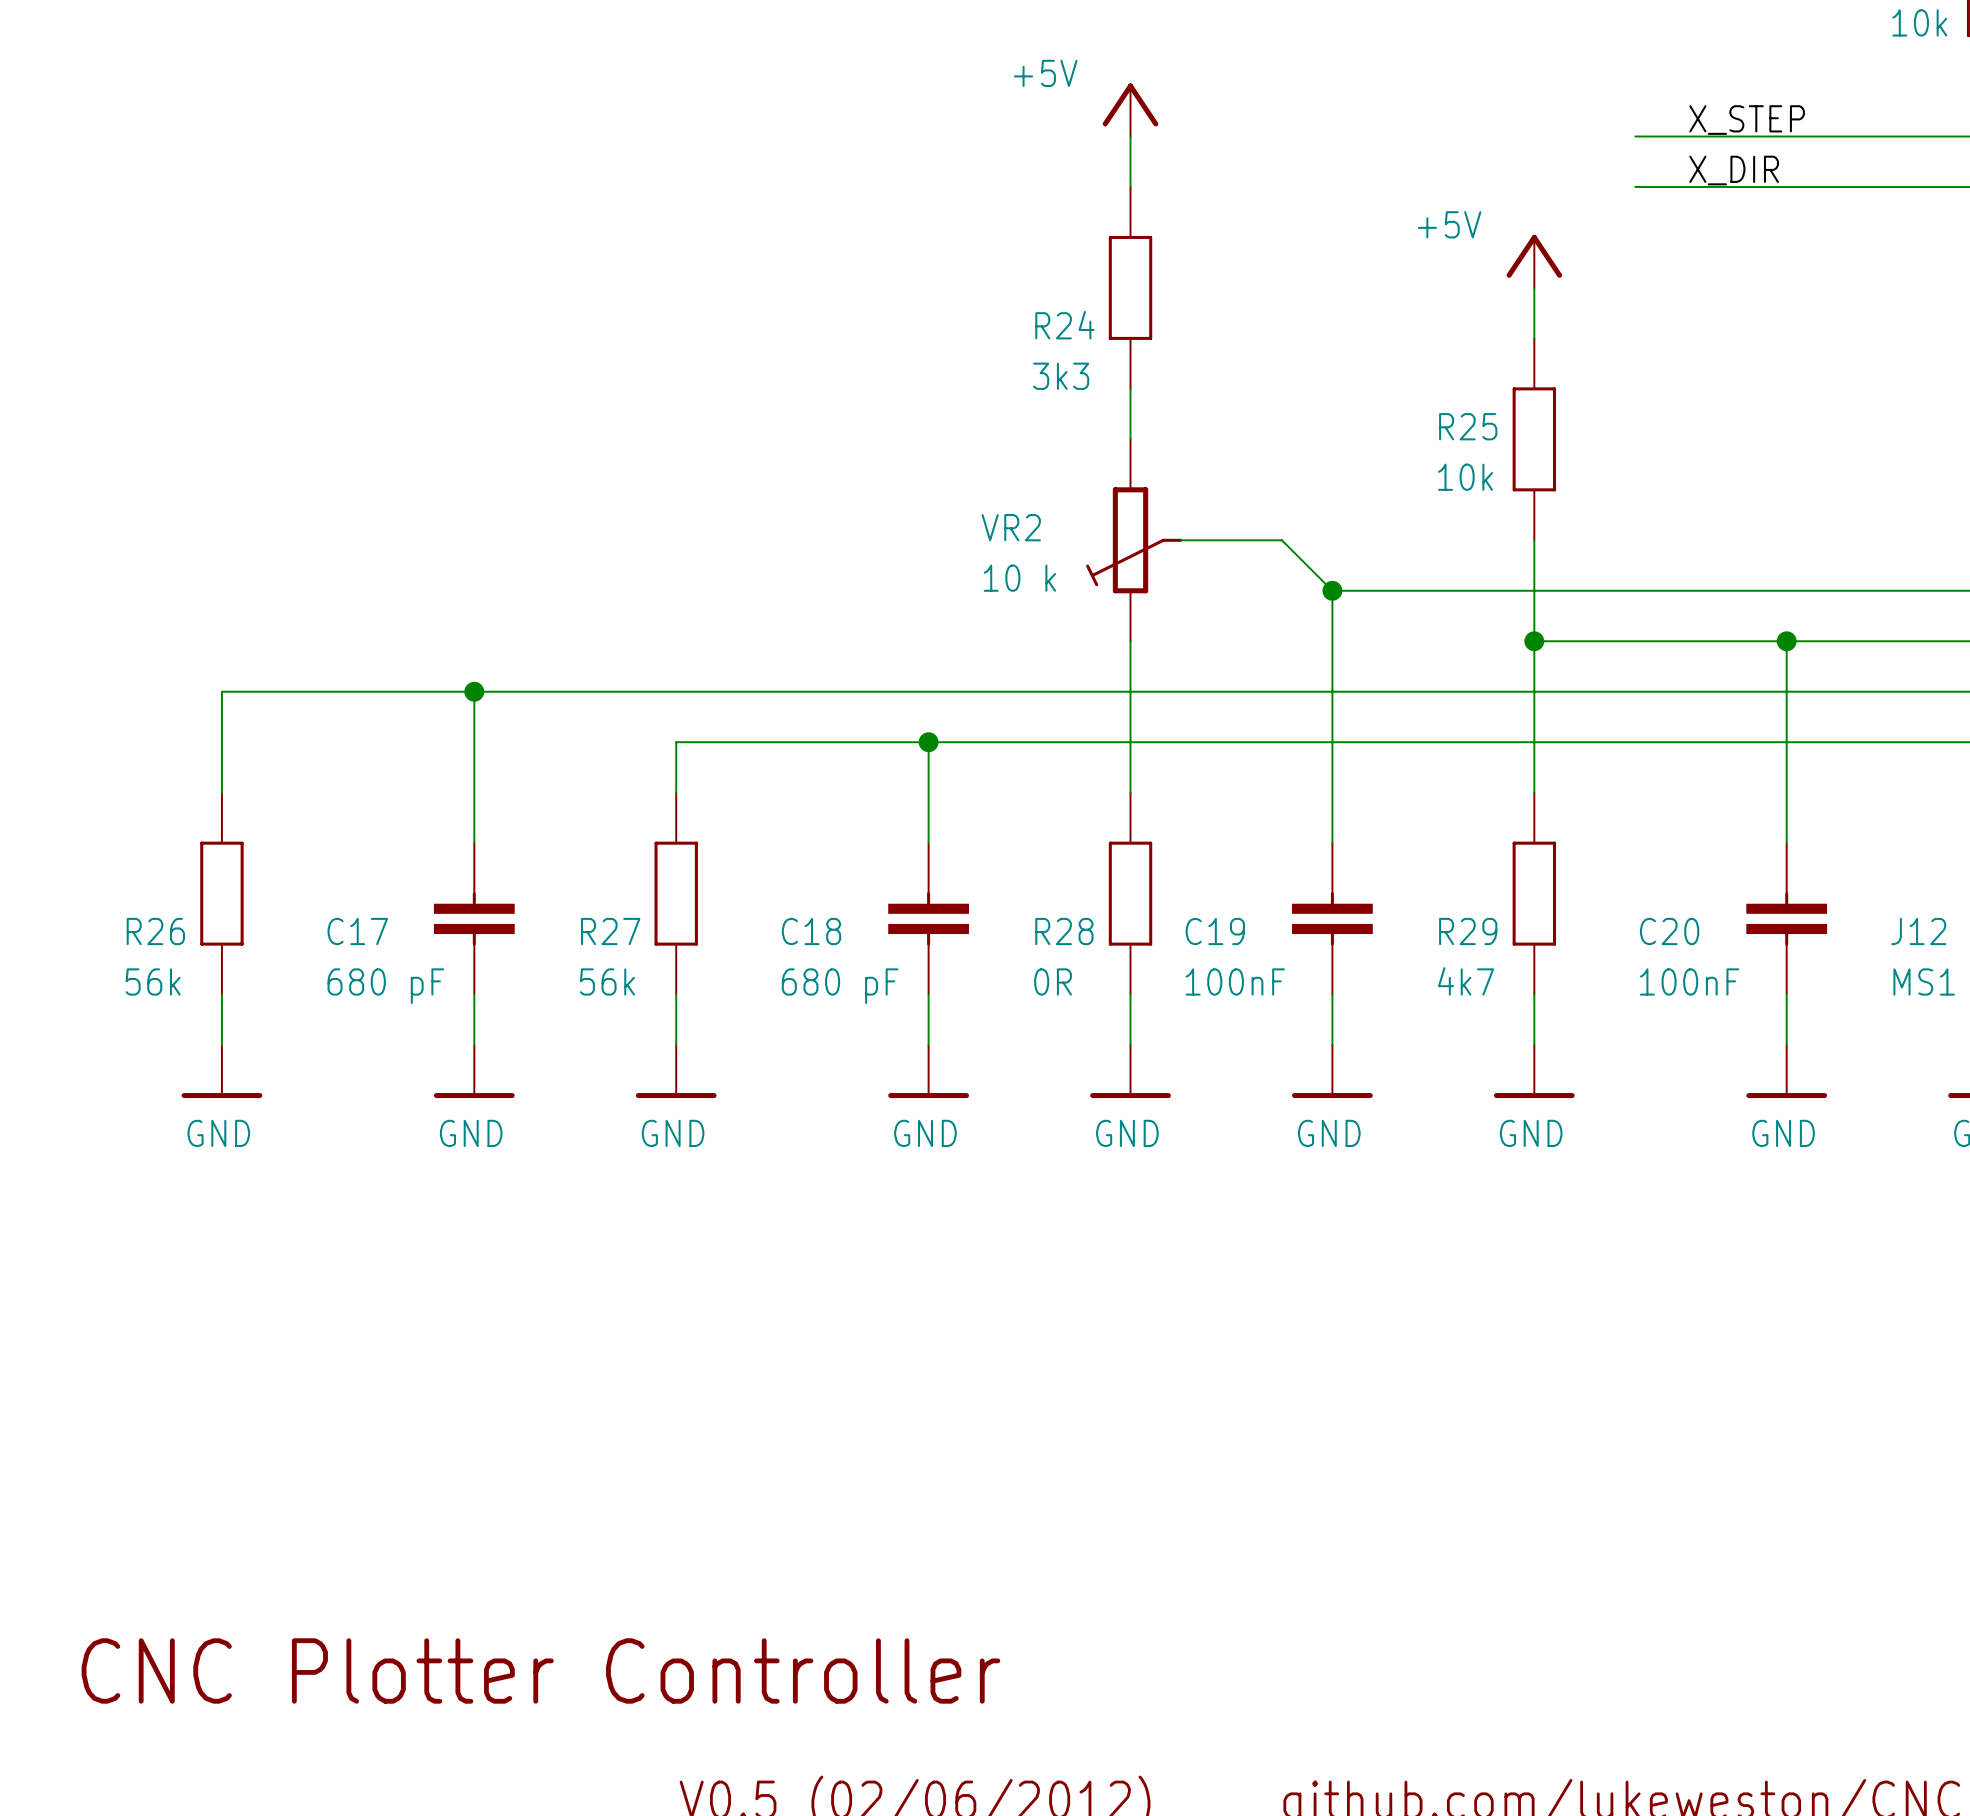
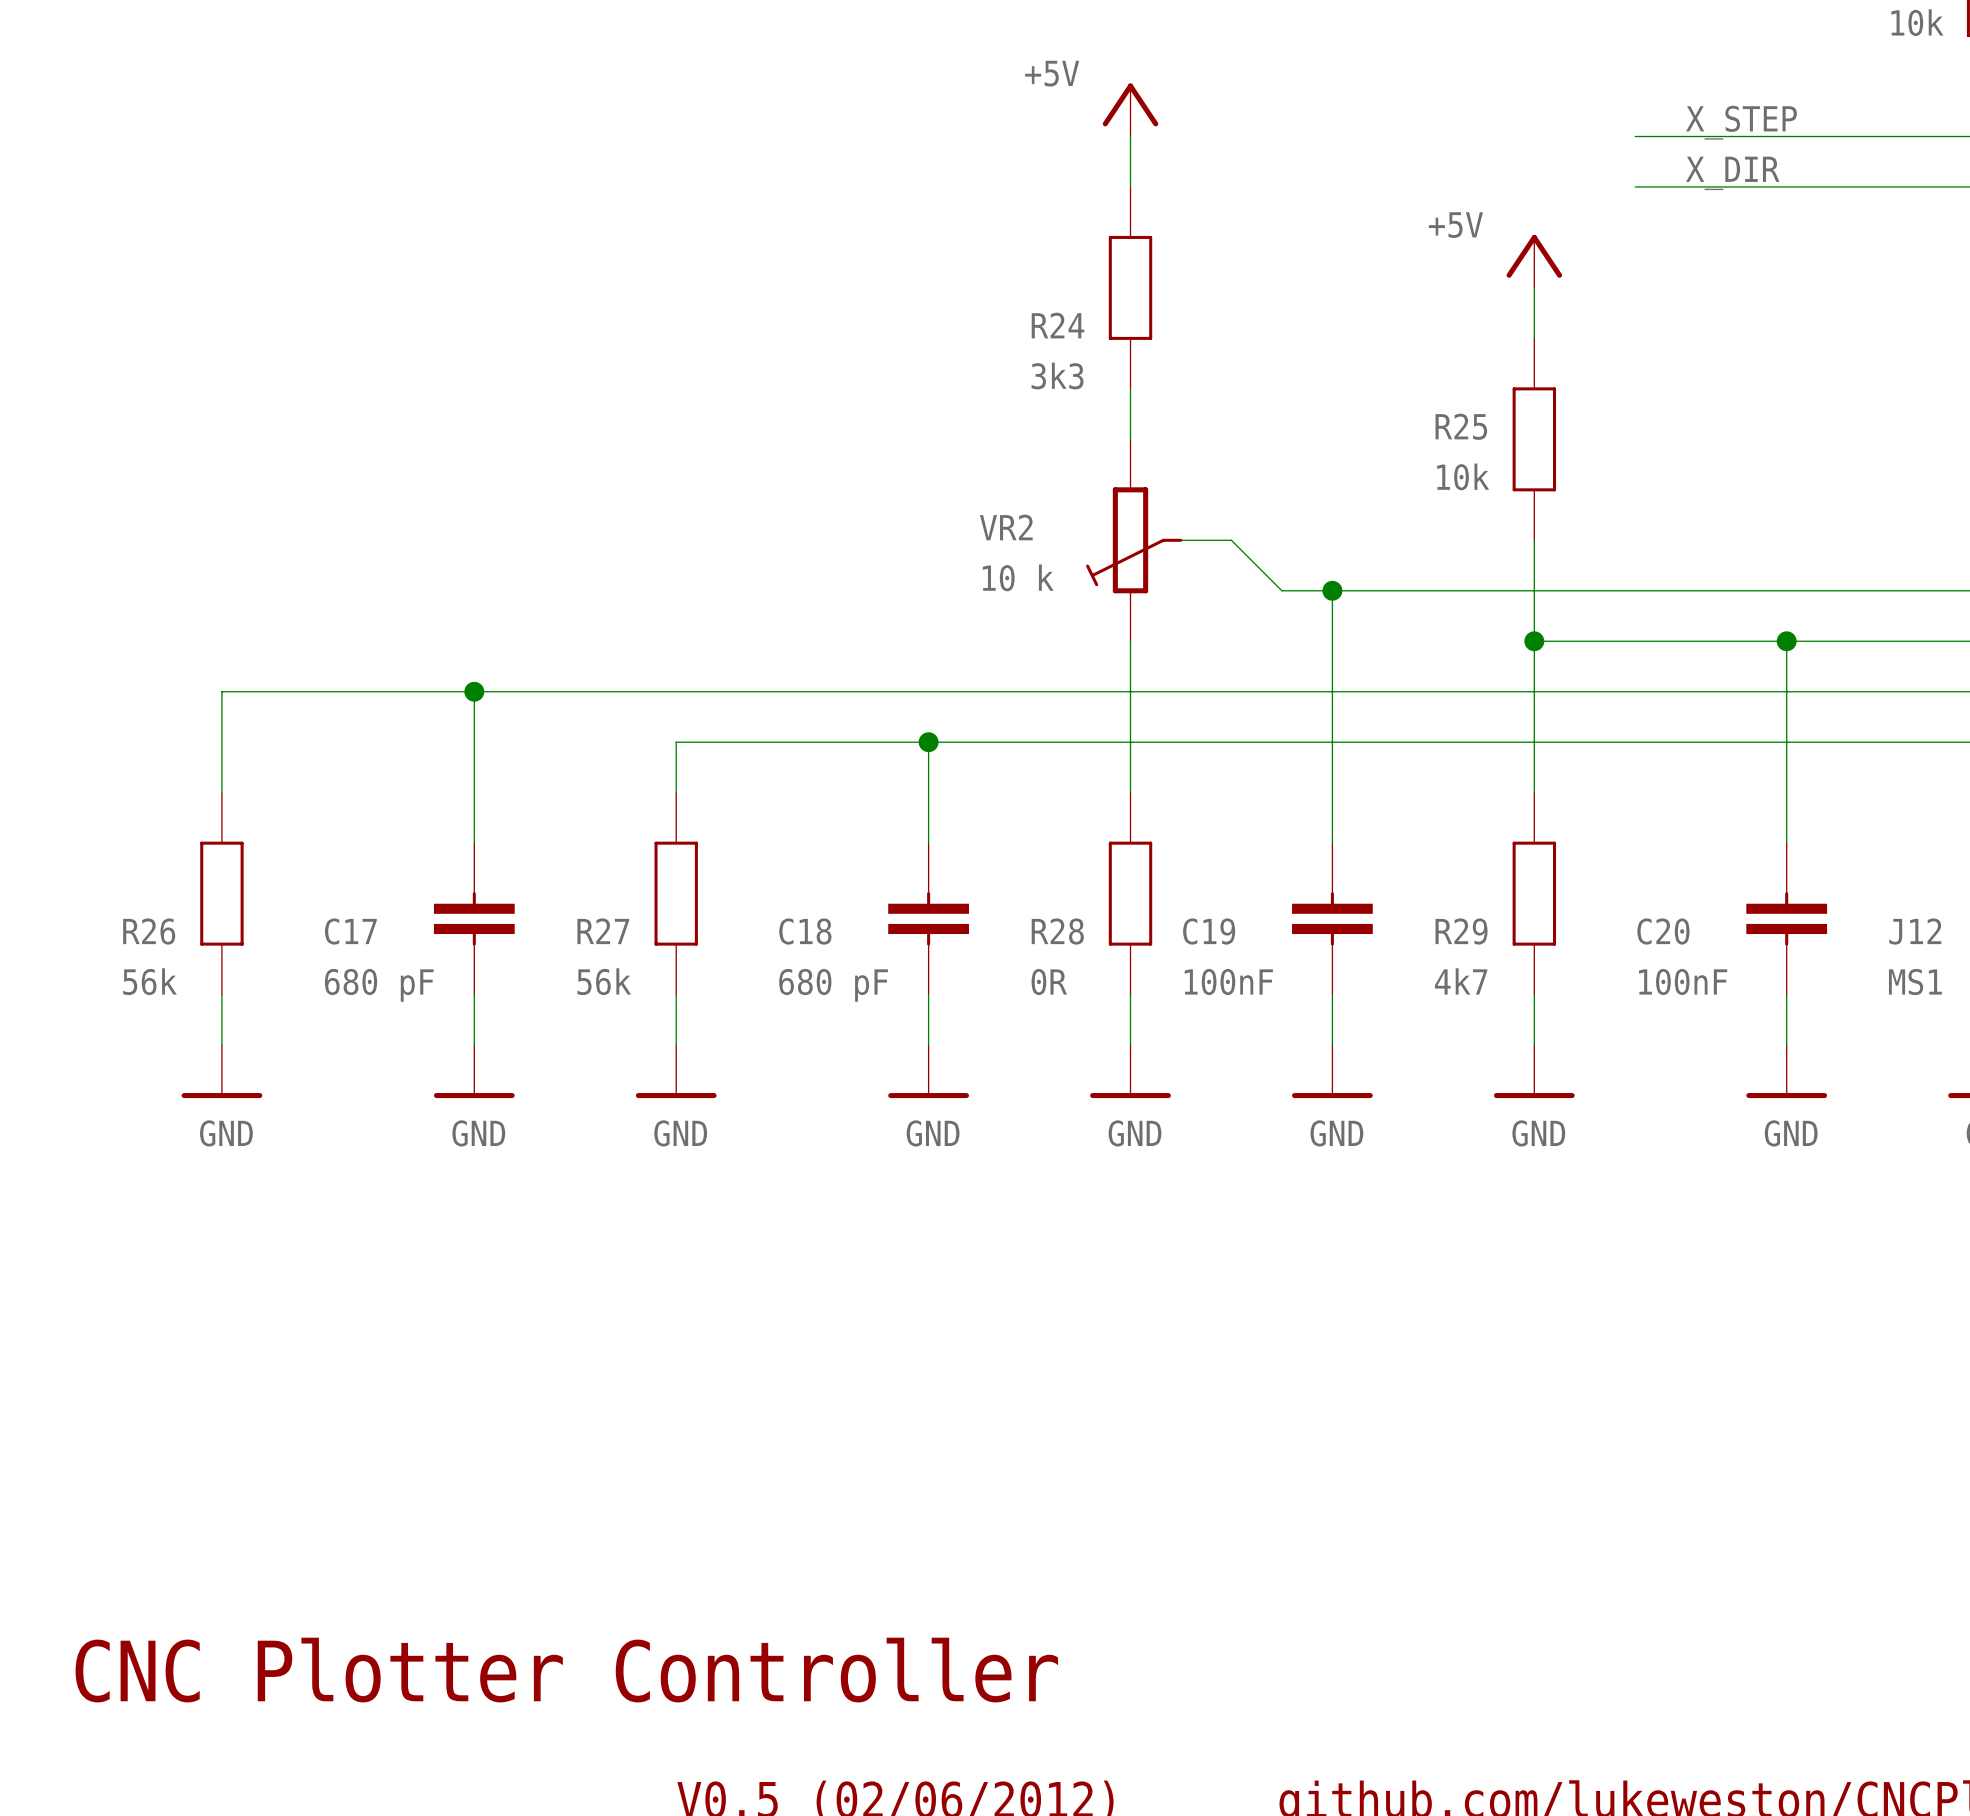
wire: (1231, 540) (1281, 540) (1332, 590) -> (1231, 540) (1281, 590) (1332, 590)

